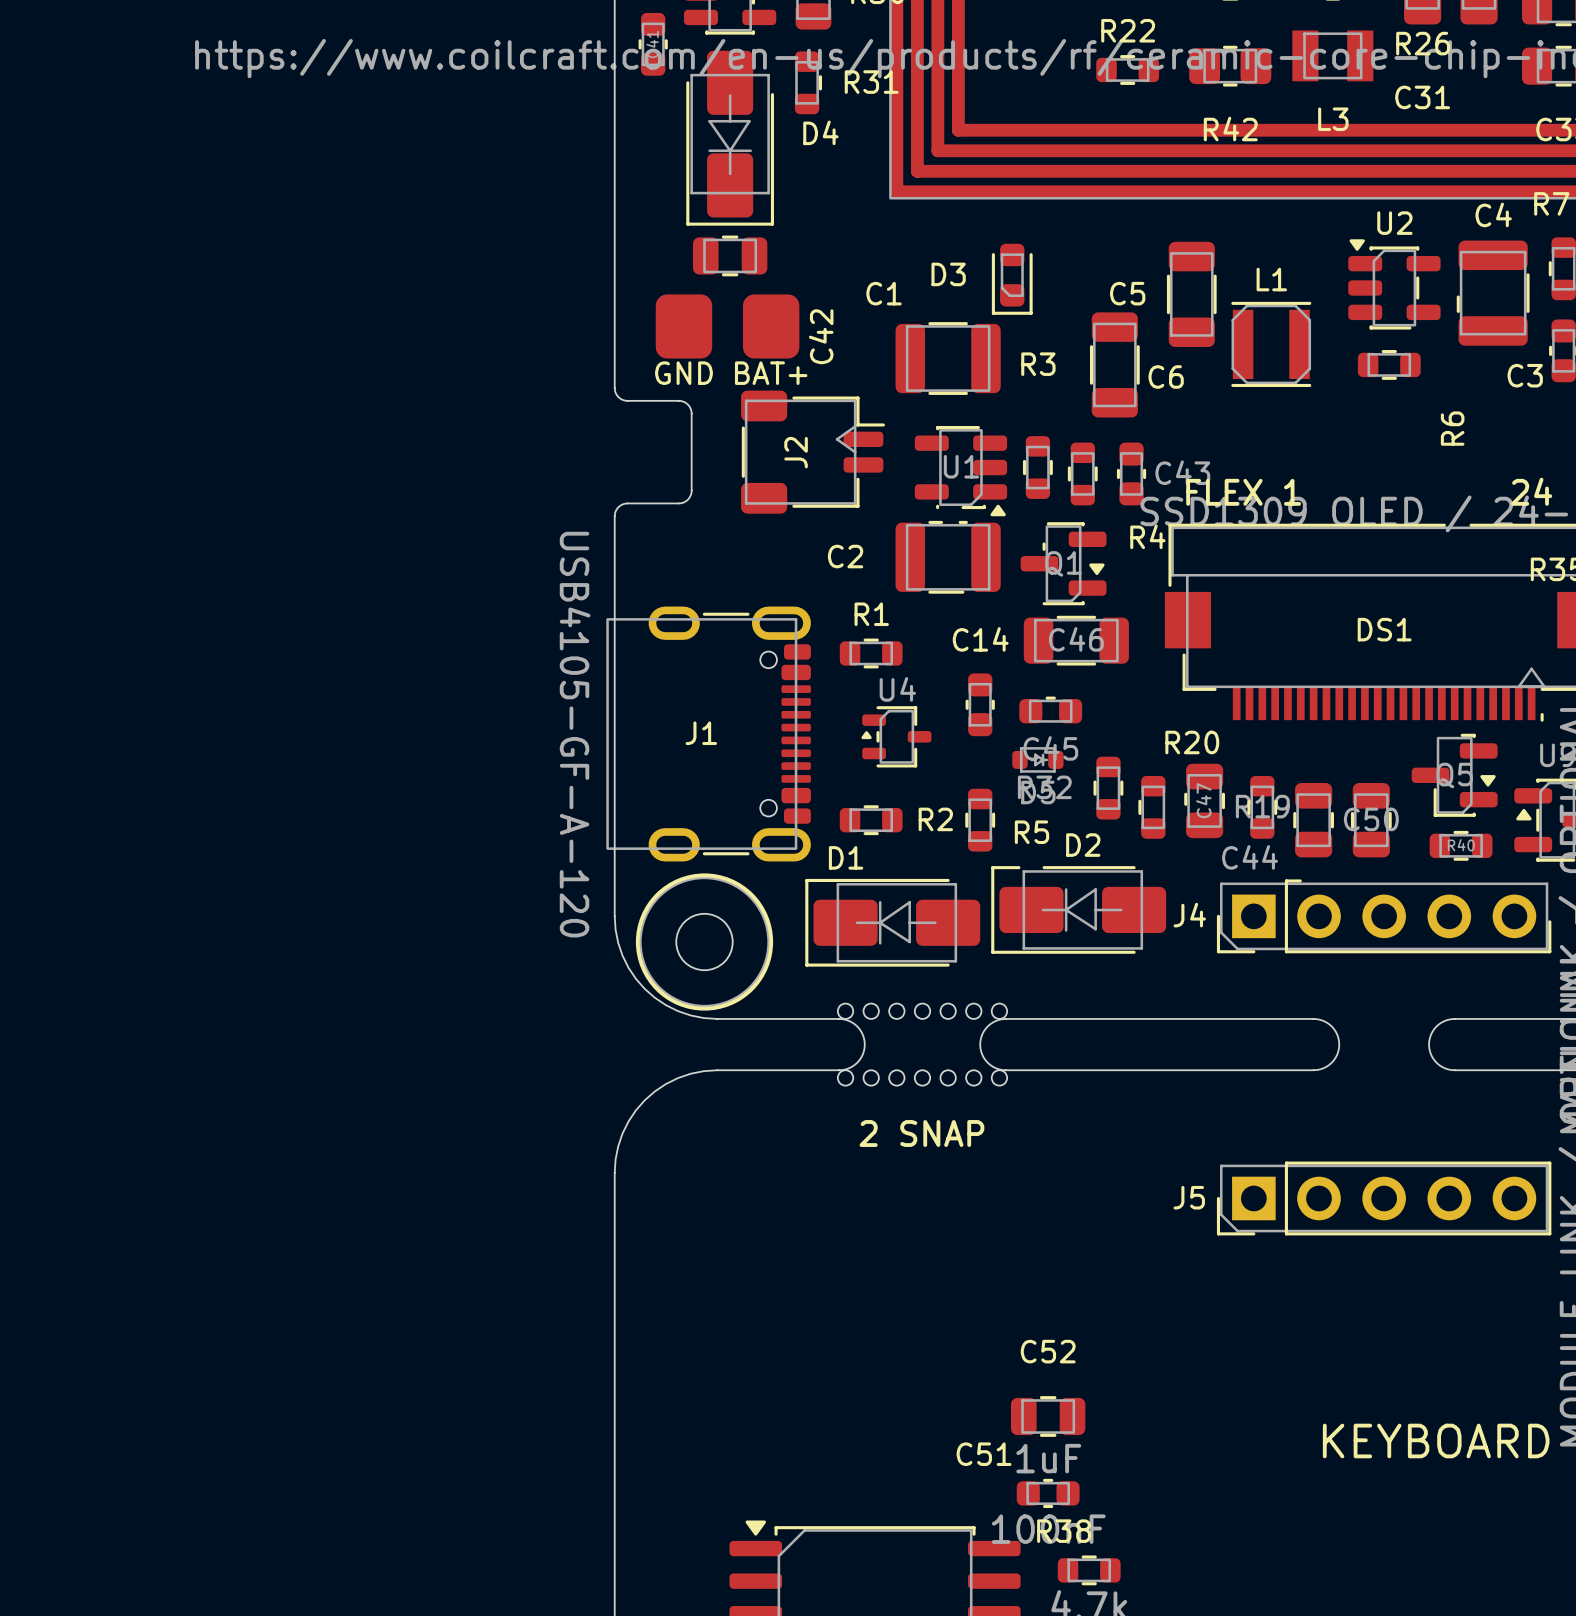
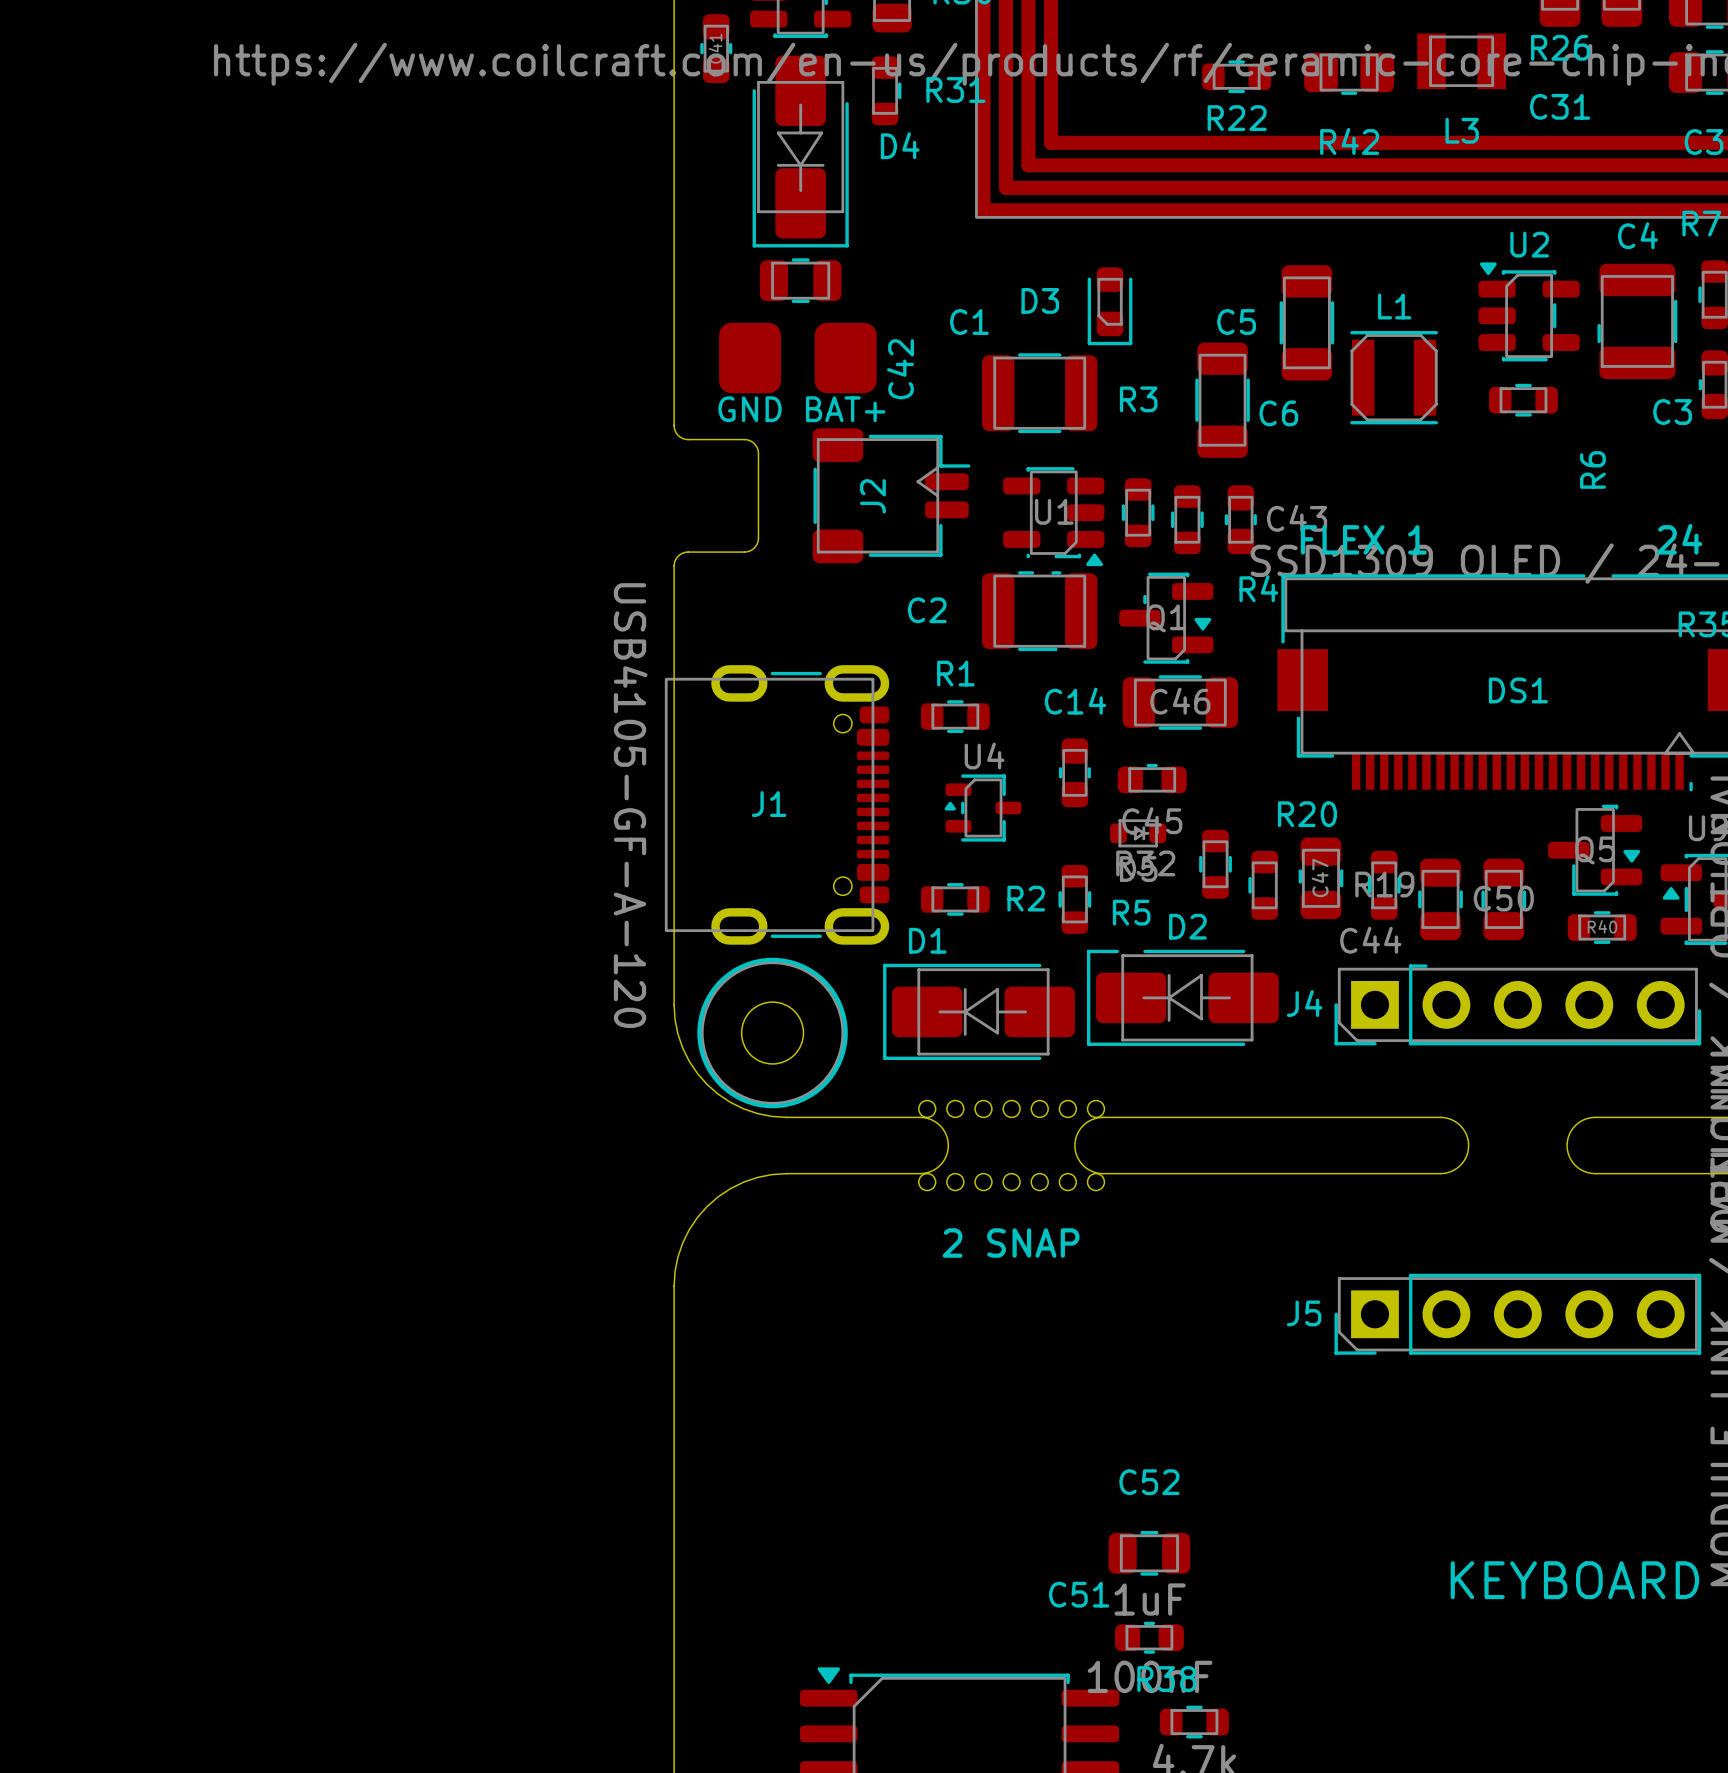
R22 name position: R22 (1128, 30) -> R22 (1237, 118)
R42 footprint: [1189, 45, 1272, 87] -> [1304, 52, 1395, 95]

